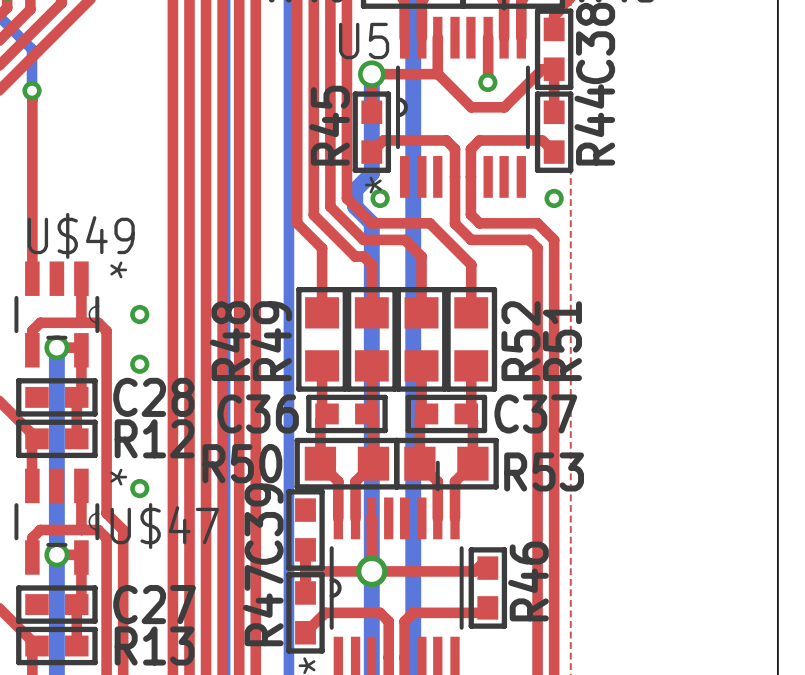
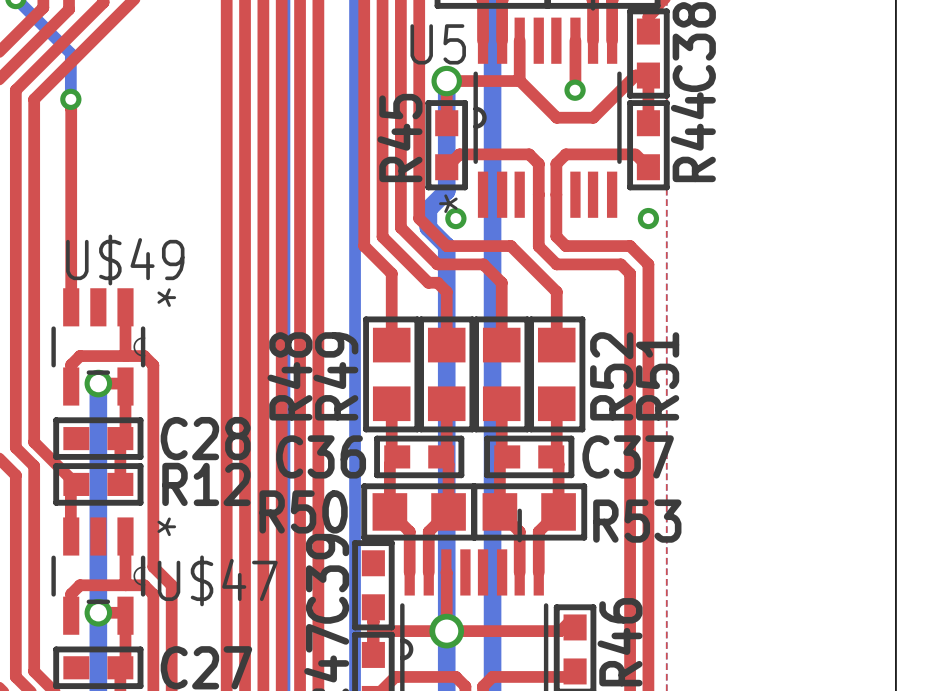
via: (139, 314) -> none
via: (139, 364) -> none
via: (139, 488) -> none

